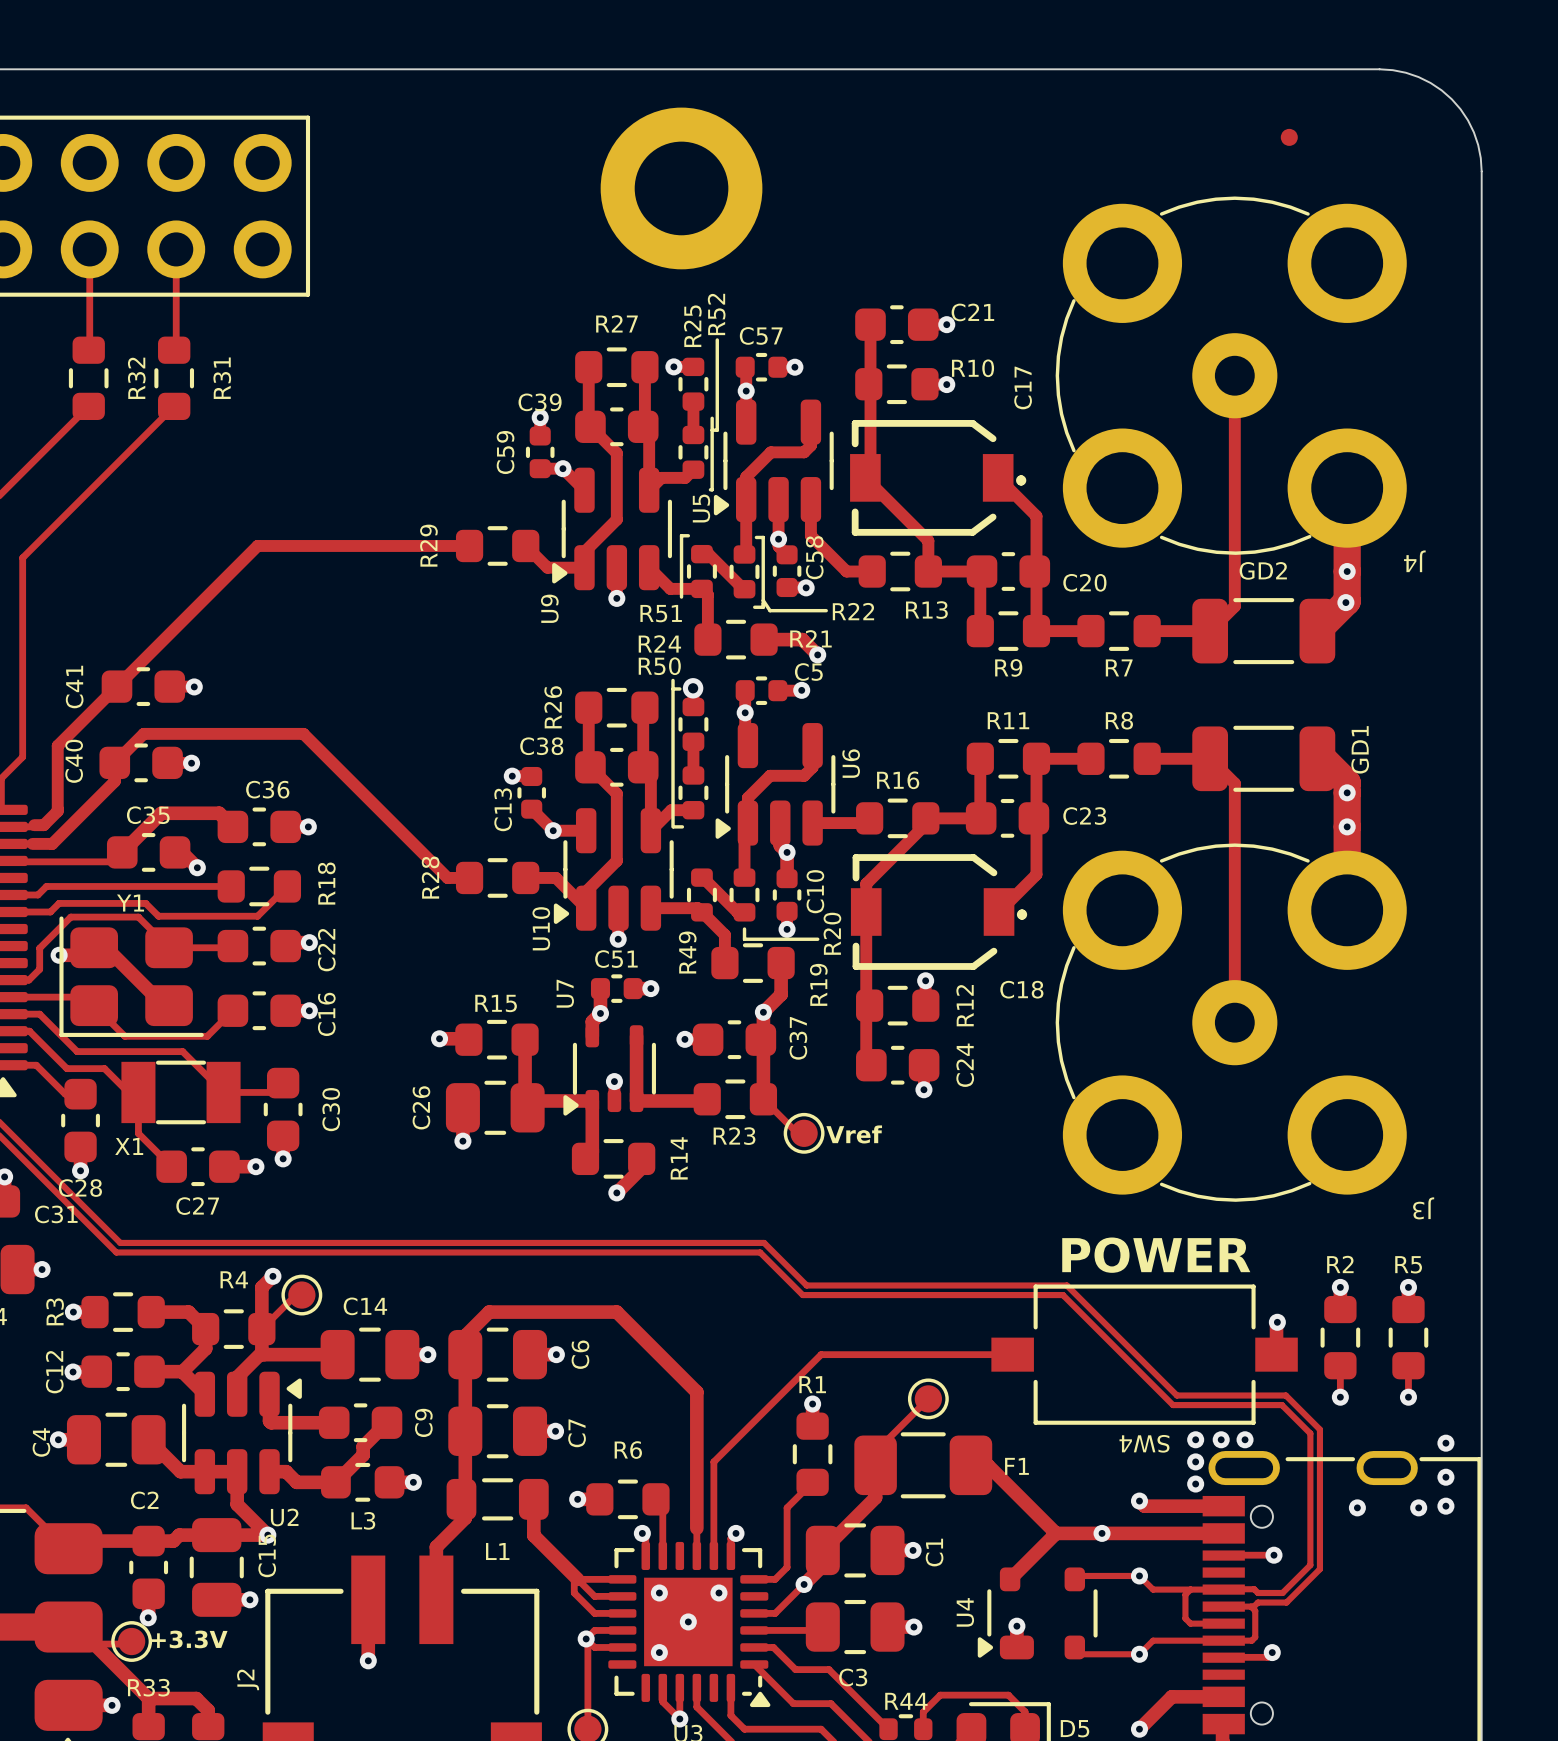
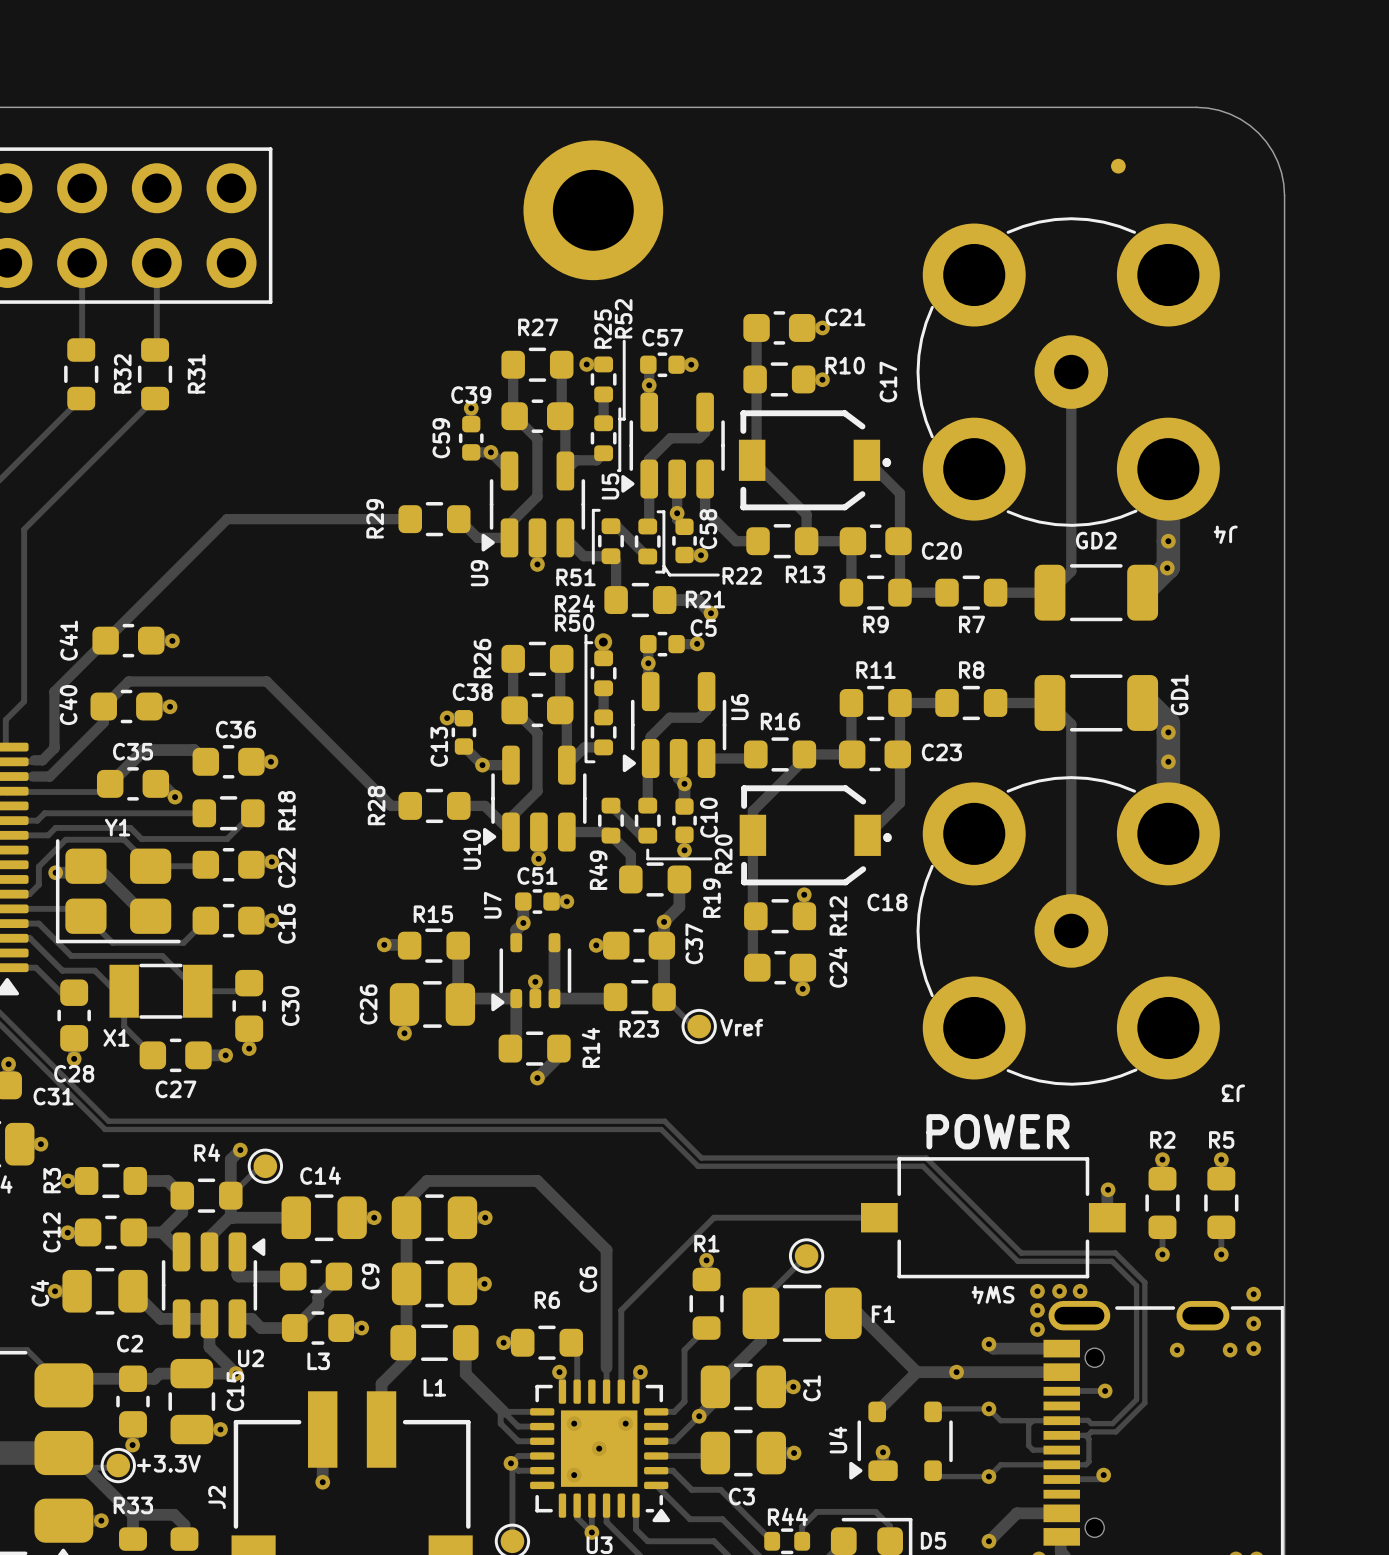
C6 name position: C6 (580, 1354) -> C6 (588, 1279)
C7 name: C7 (577, 1433) -> none

